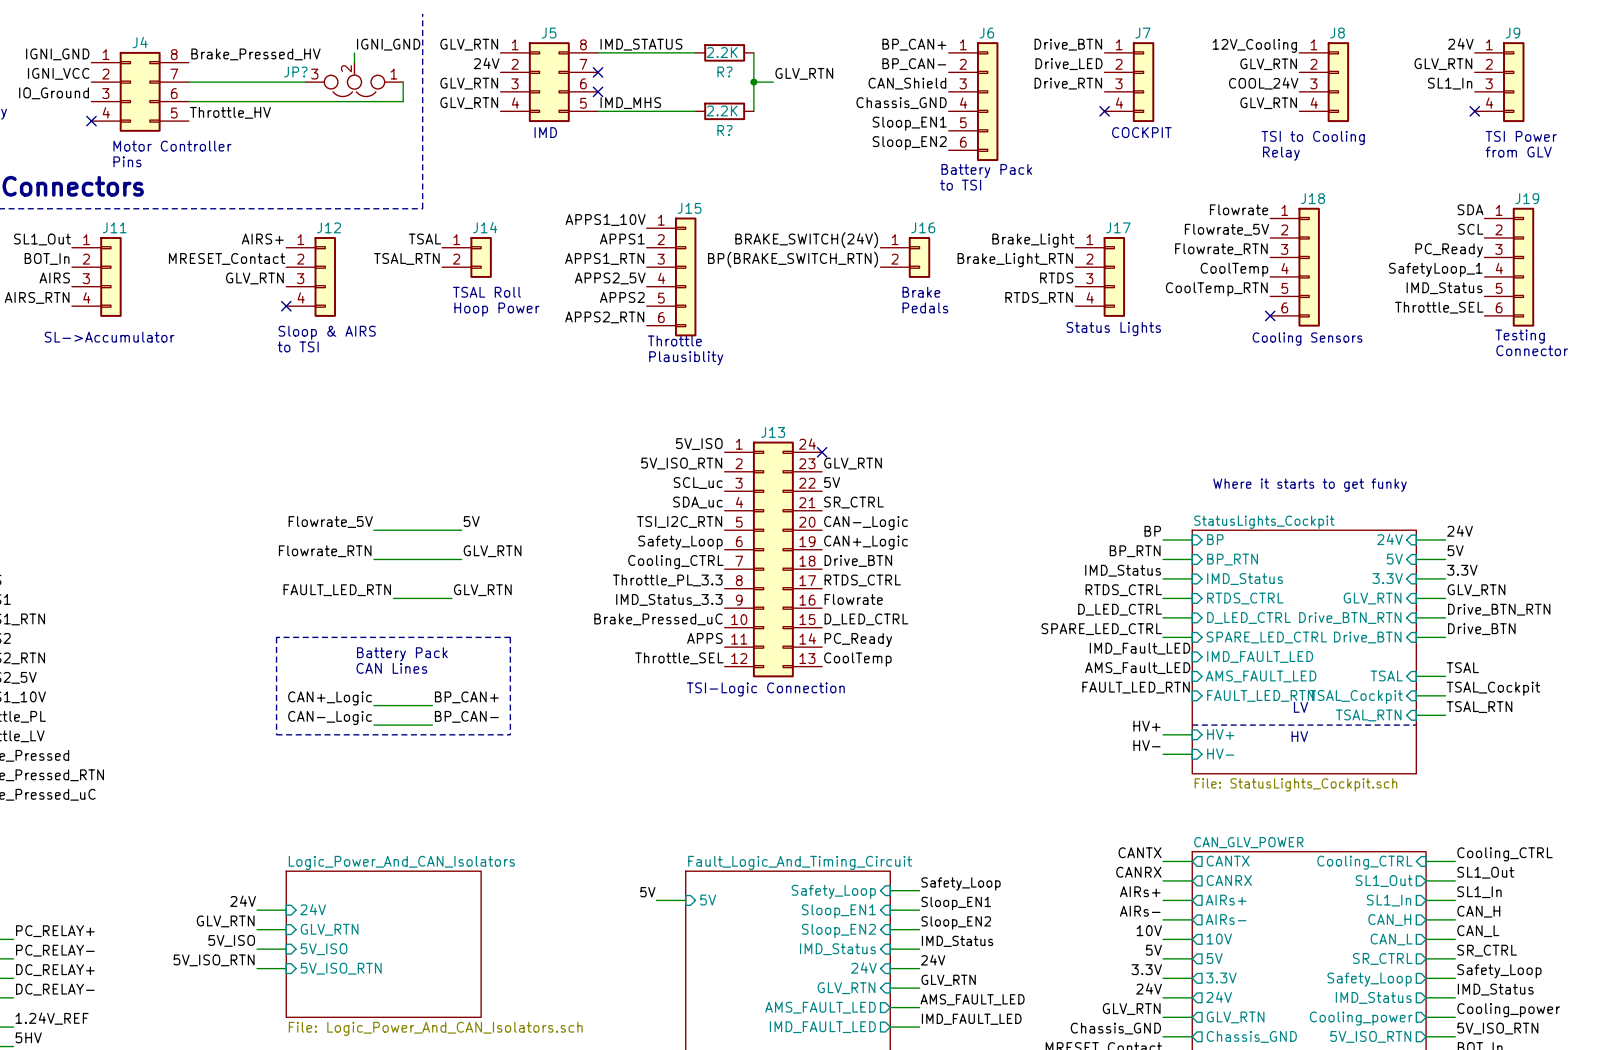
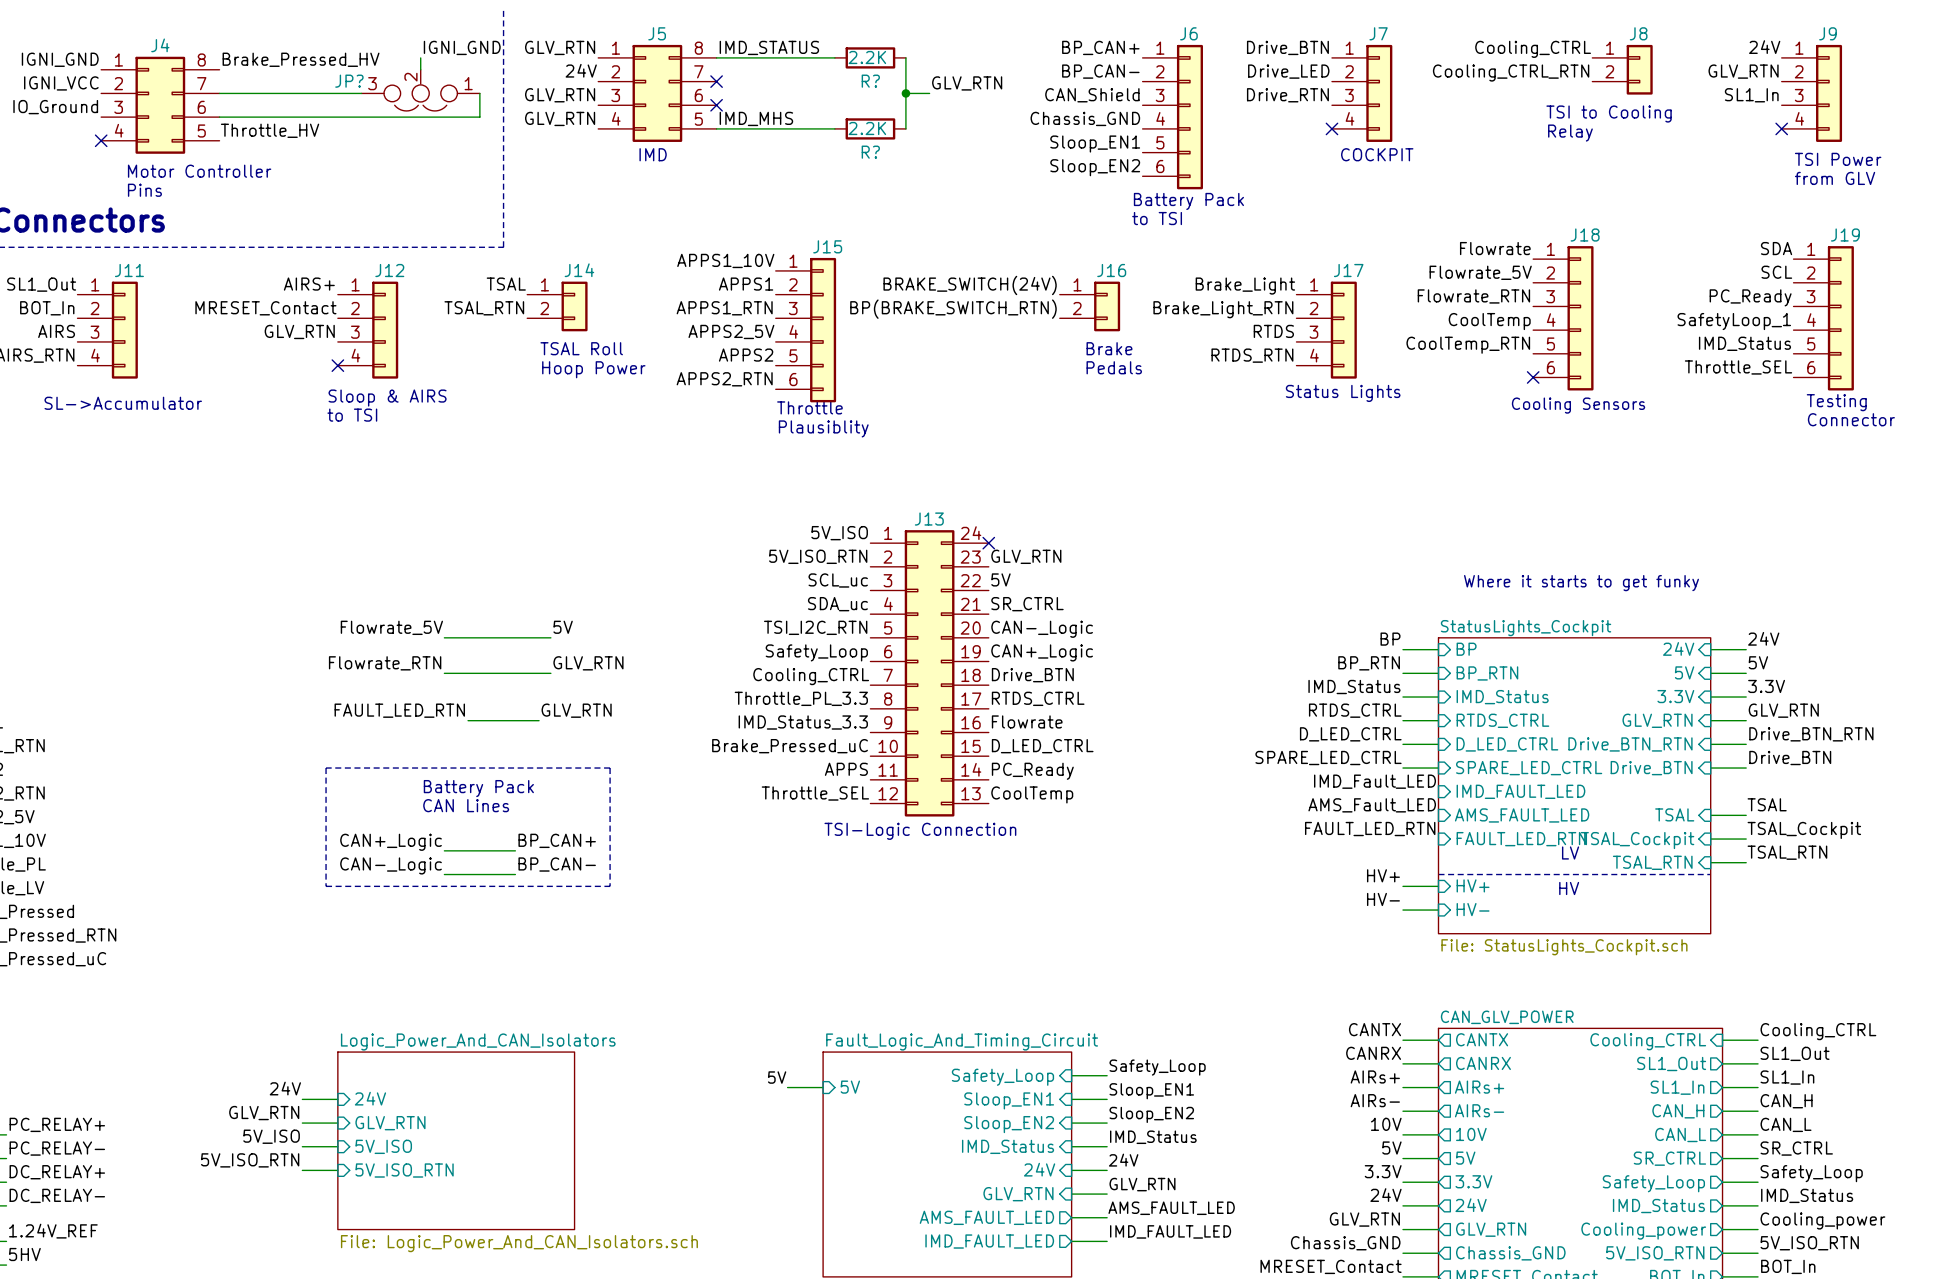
label: 12V_Cooling (1254, 45) -> Cooling_CTRL (1533, 49)
part: none -> J8 (1622, 69)
label: GLV_RTN (1268, 64) -> none
label: none -> Cooling_CTRL_RTN (1511, 73)
part: J8 (1324, 82) -> none
label: COOL_24V (1263, 83) -> none
label: GLV_RTN (1268, 103) -> none
text position: TSI to Cooling (1313, 138) -> TSI to Cooling (1609, 114)
text position: Relay (1281, 153) -> Relay (1570, 133)

